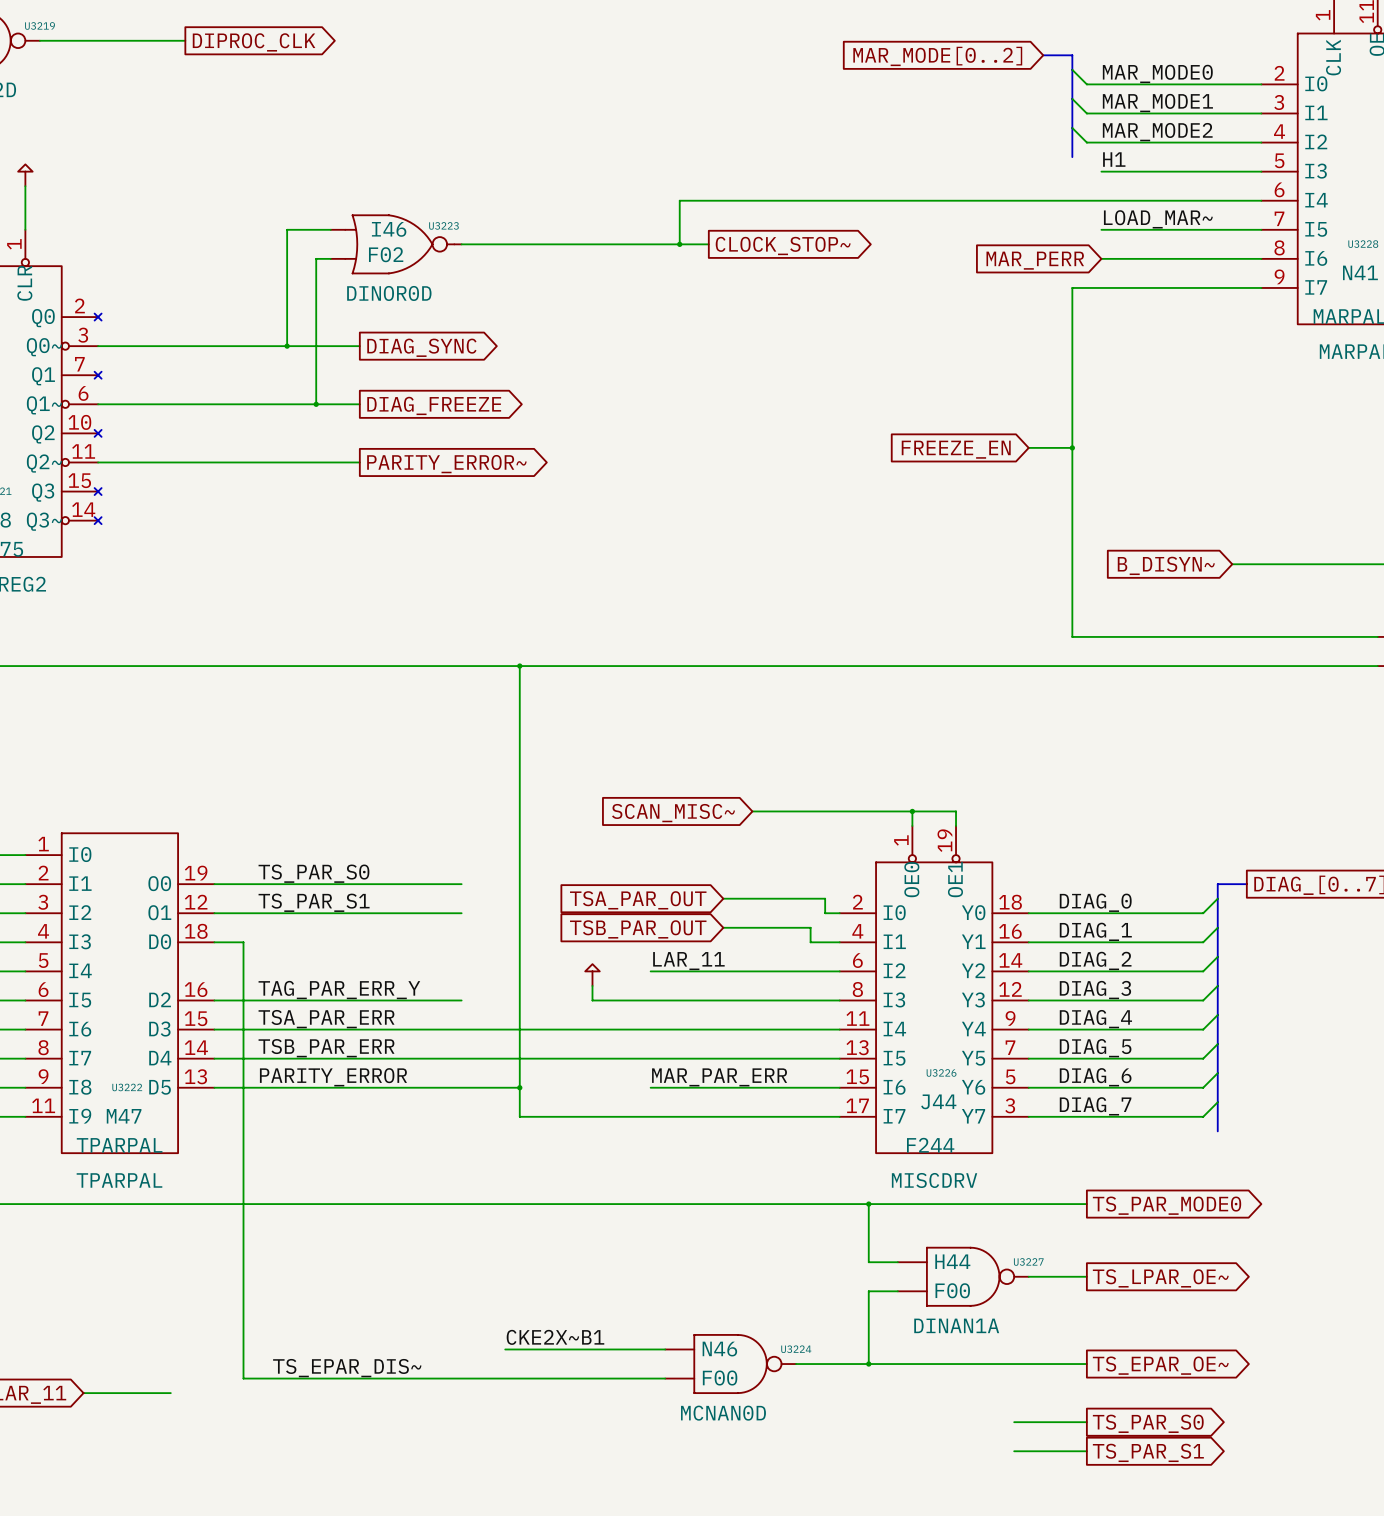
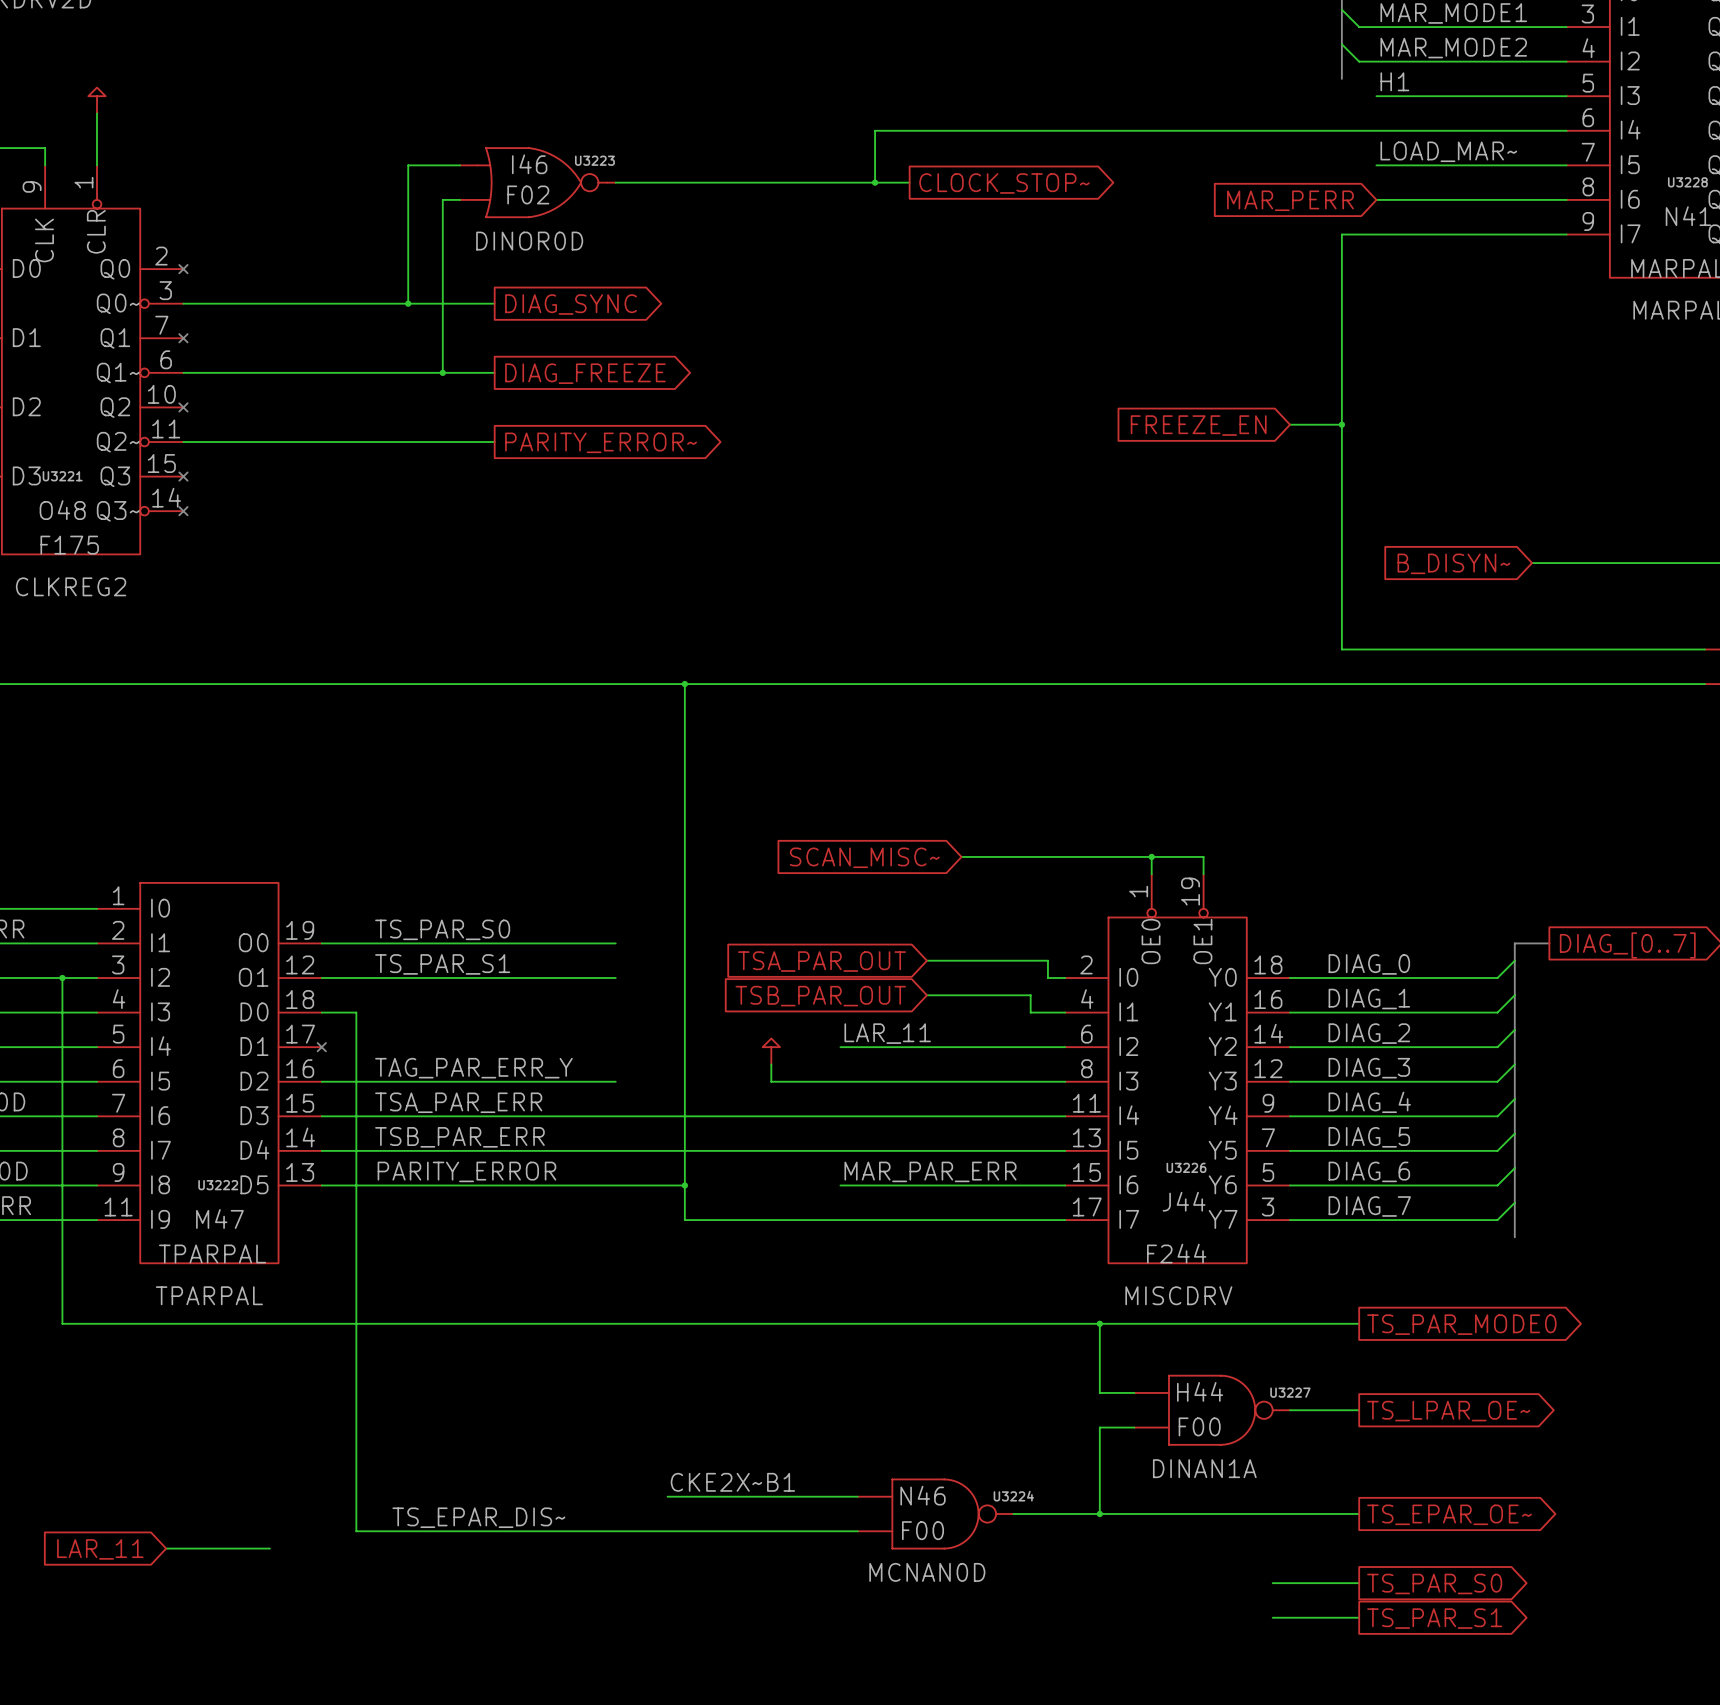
U3222 symbol: [25, 833, 215, 1154] -> [97, 882, 322, 1264]
no-connect mark: none -> (321, 1047)

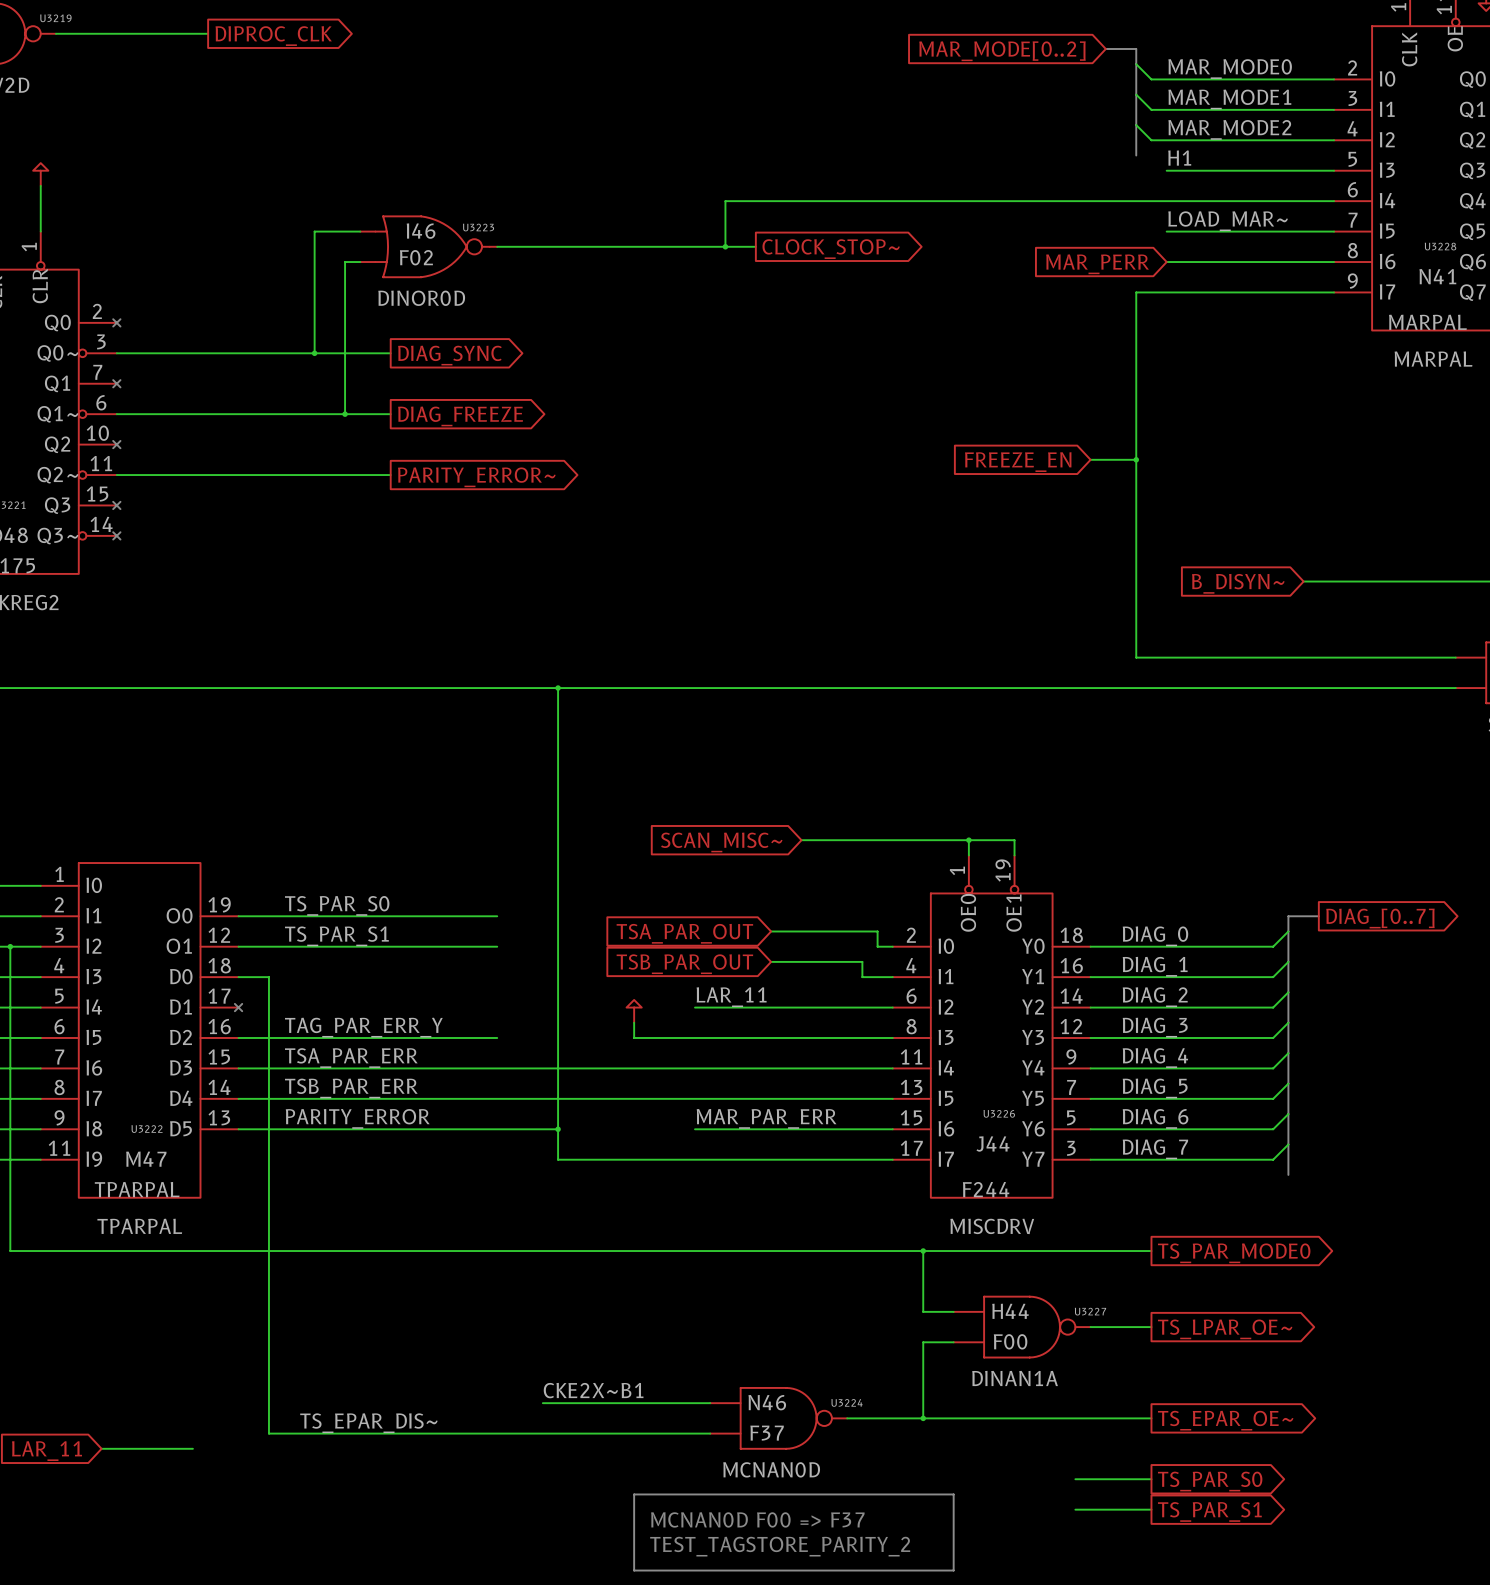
U3224 value: F00 (923, 1530) -> F37 (767, 1433)
line: none -> (634, 1494) (634, 1570) (953, 1570) (953, 1494) (634, 1494)
text: none -> MCNAN0D F00 => F37 (757, 1519)
text: none -> TEST_TAGSTORE_PARITY_2 (780, 1546)

